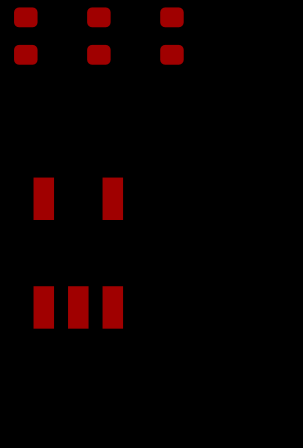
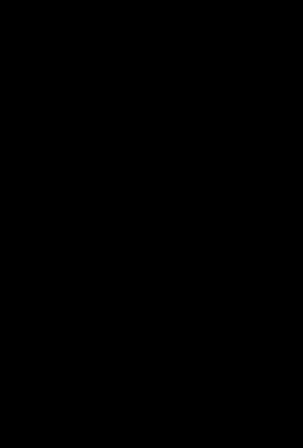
part: (25, 36) -> none
part: (98, 36) -> none
part: (171, 36) -> none
part: (78, 253) -> none

